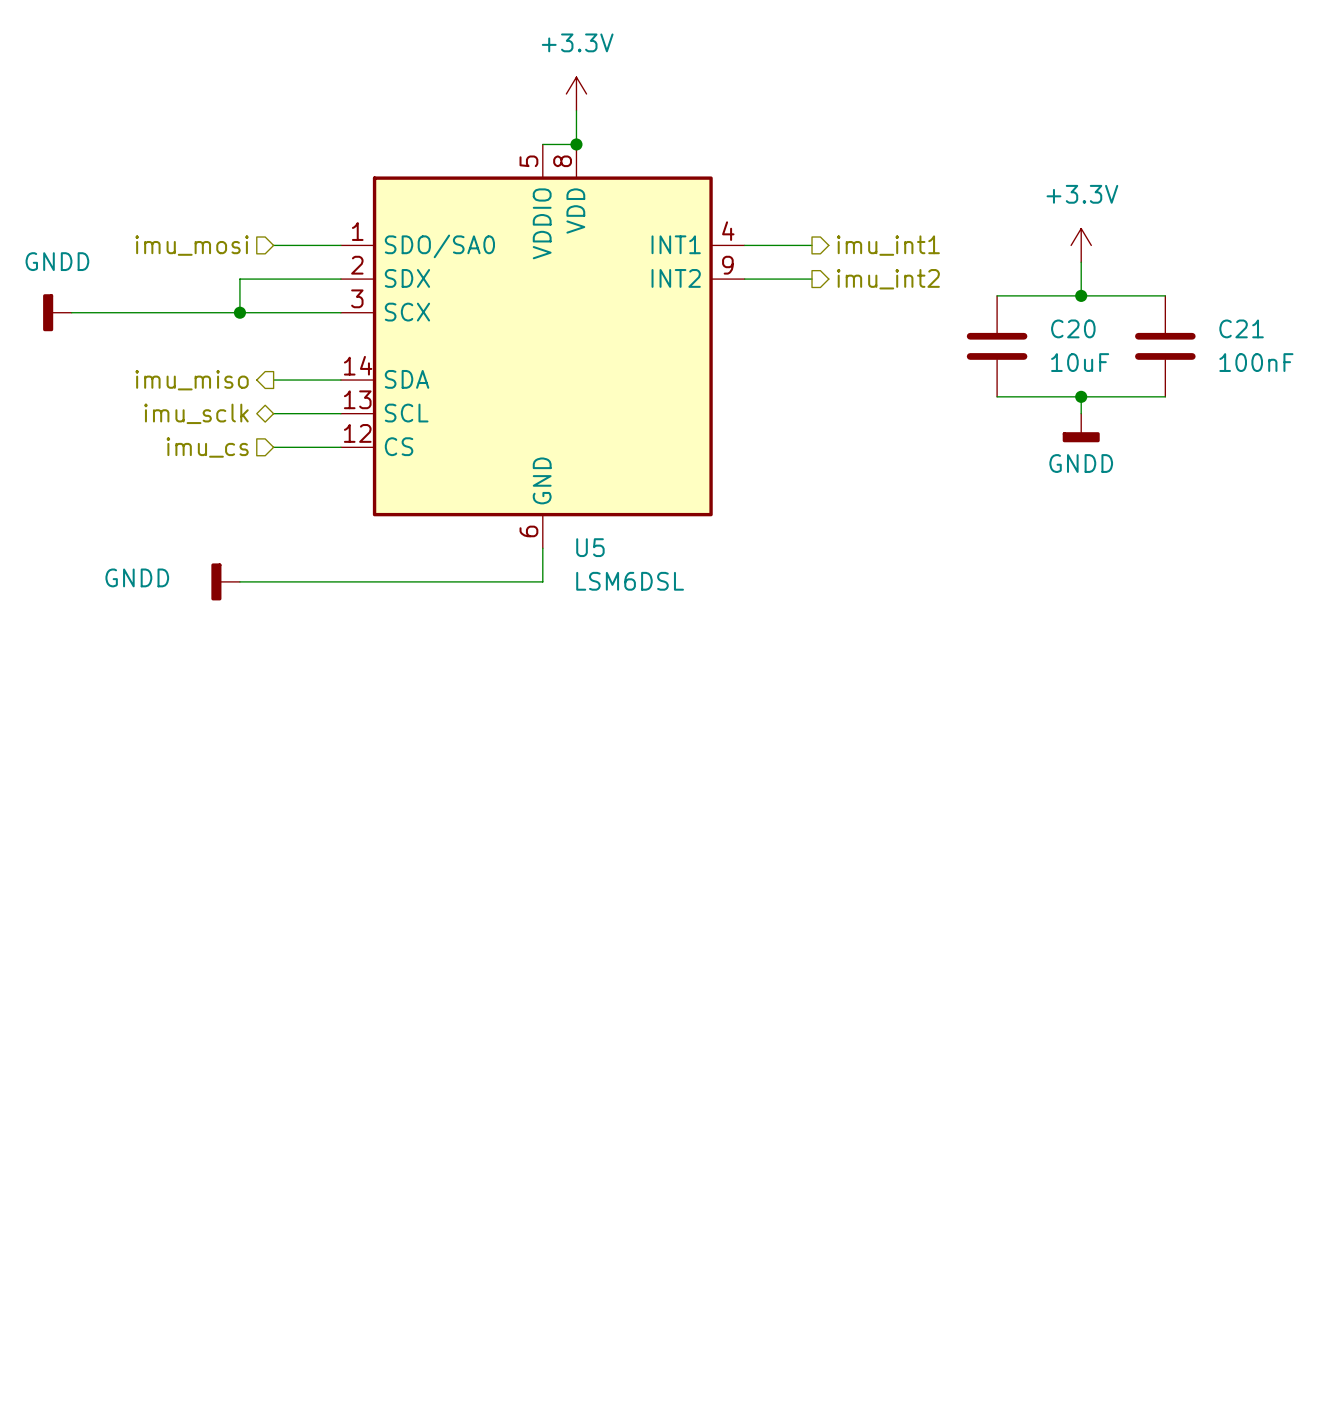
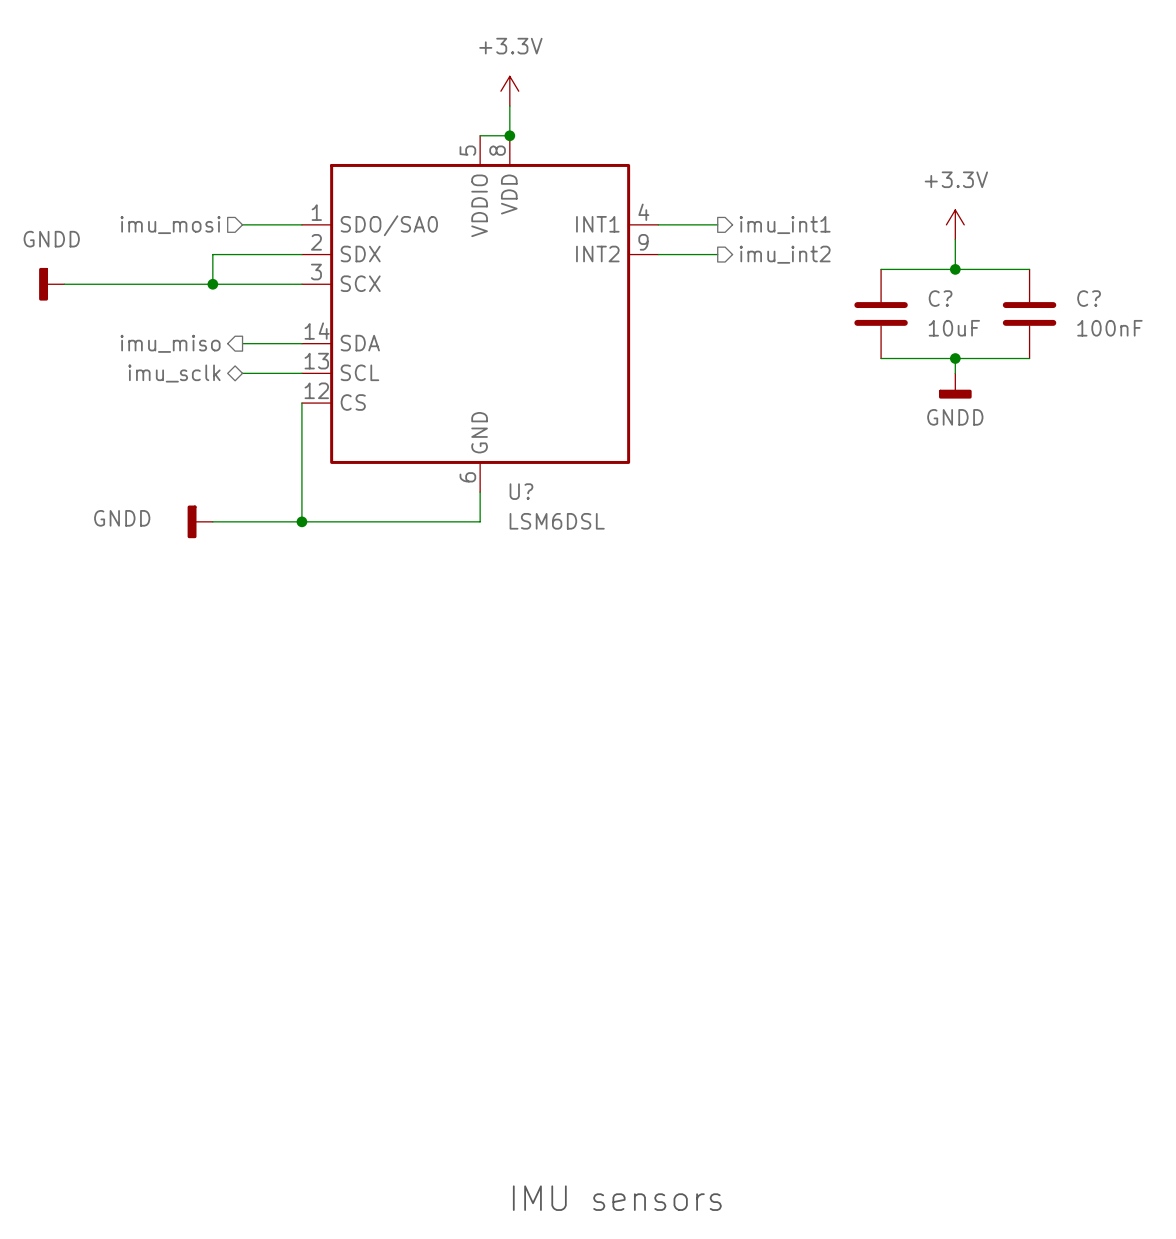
C20 name: C20 (1073, 328) -> C? (940, 298)
C21 name: C21 (1241, 328) -> C? (1089, 298)
hierarchical label: imu_cs (207, 447) -> none
wire: (273, 447) (340, 447) -> (301, 521) (301, 403)
U5 name: U5 (590, 547) -> U? (521, 491)
junction: none -> (301, 521)
text: none -> IMU sensors (617, 1198)

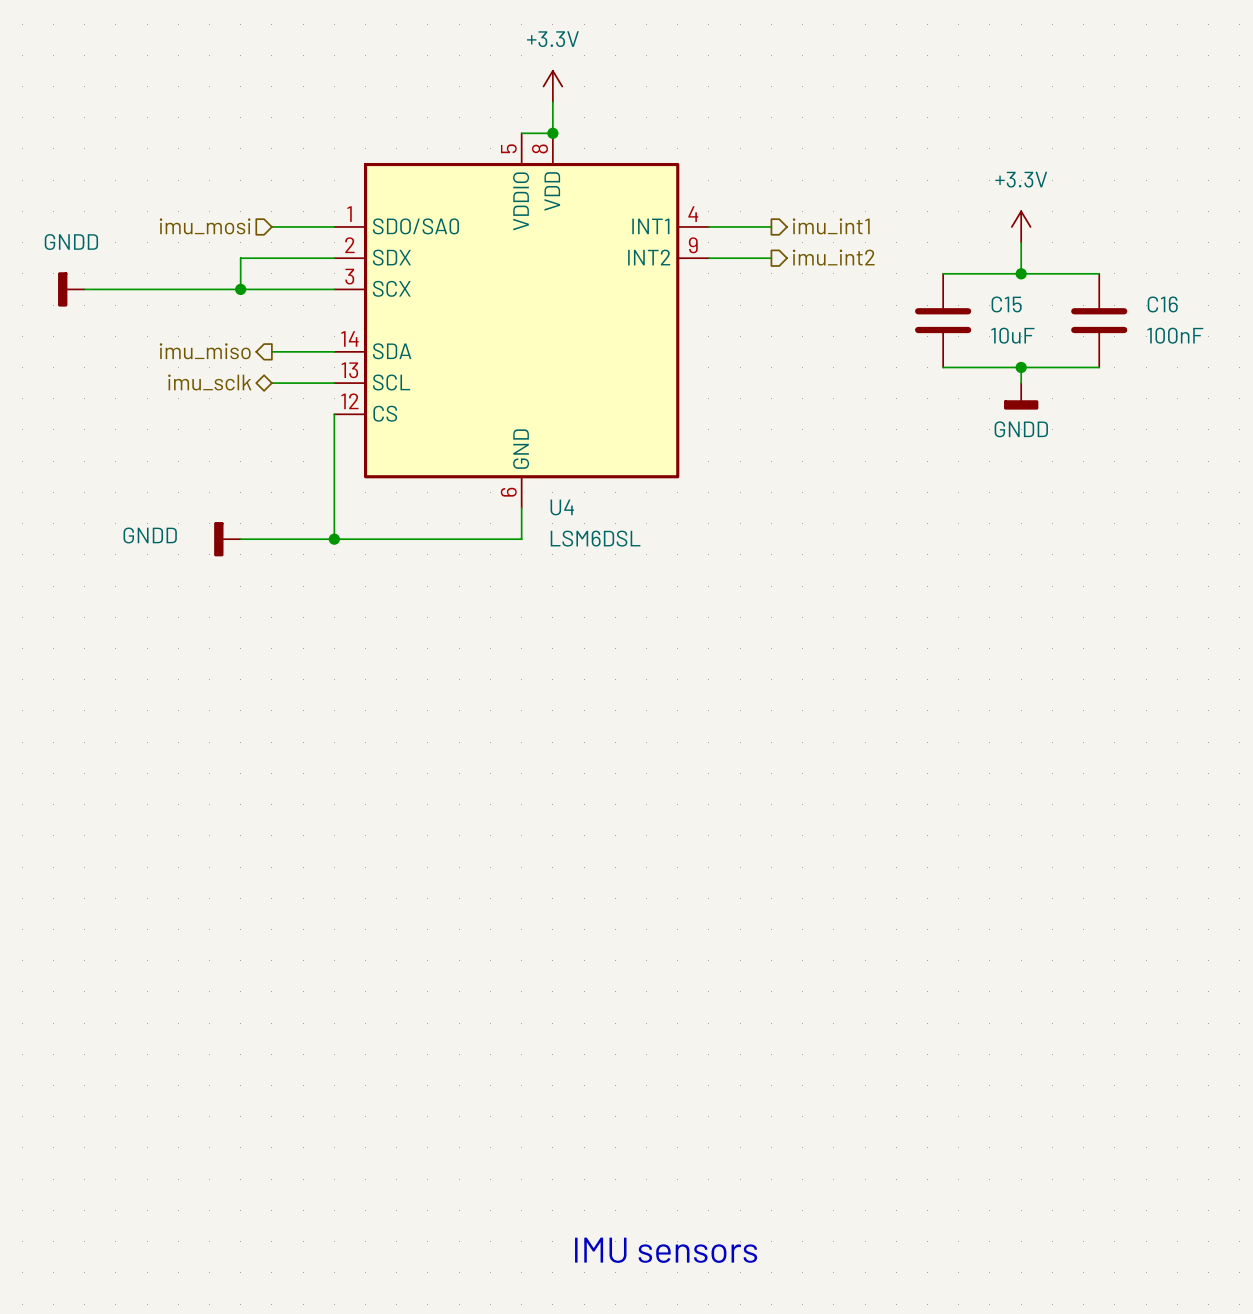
C? name: C? (940, 298) -> C15 (1006, 304)
C? name: C? (1089, 298) -> C16 (1162, 304)
U? name: U? (521, 491) -> U4 (562, 507)

